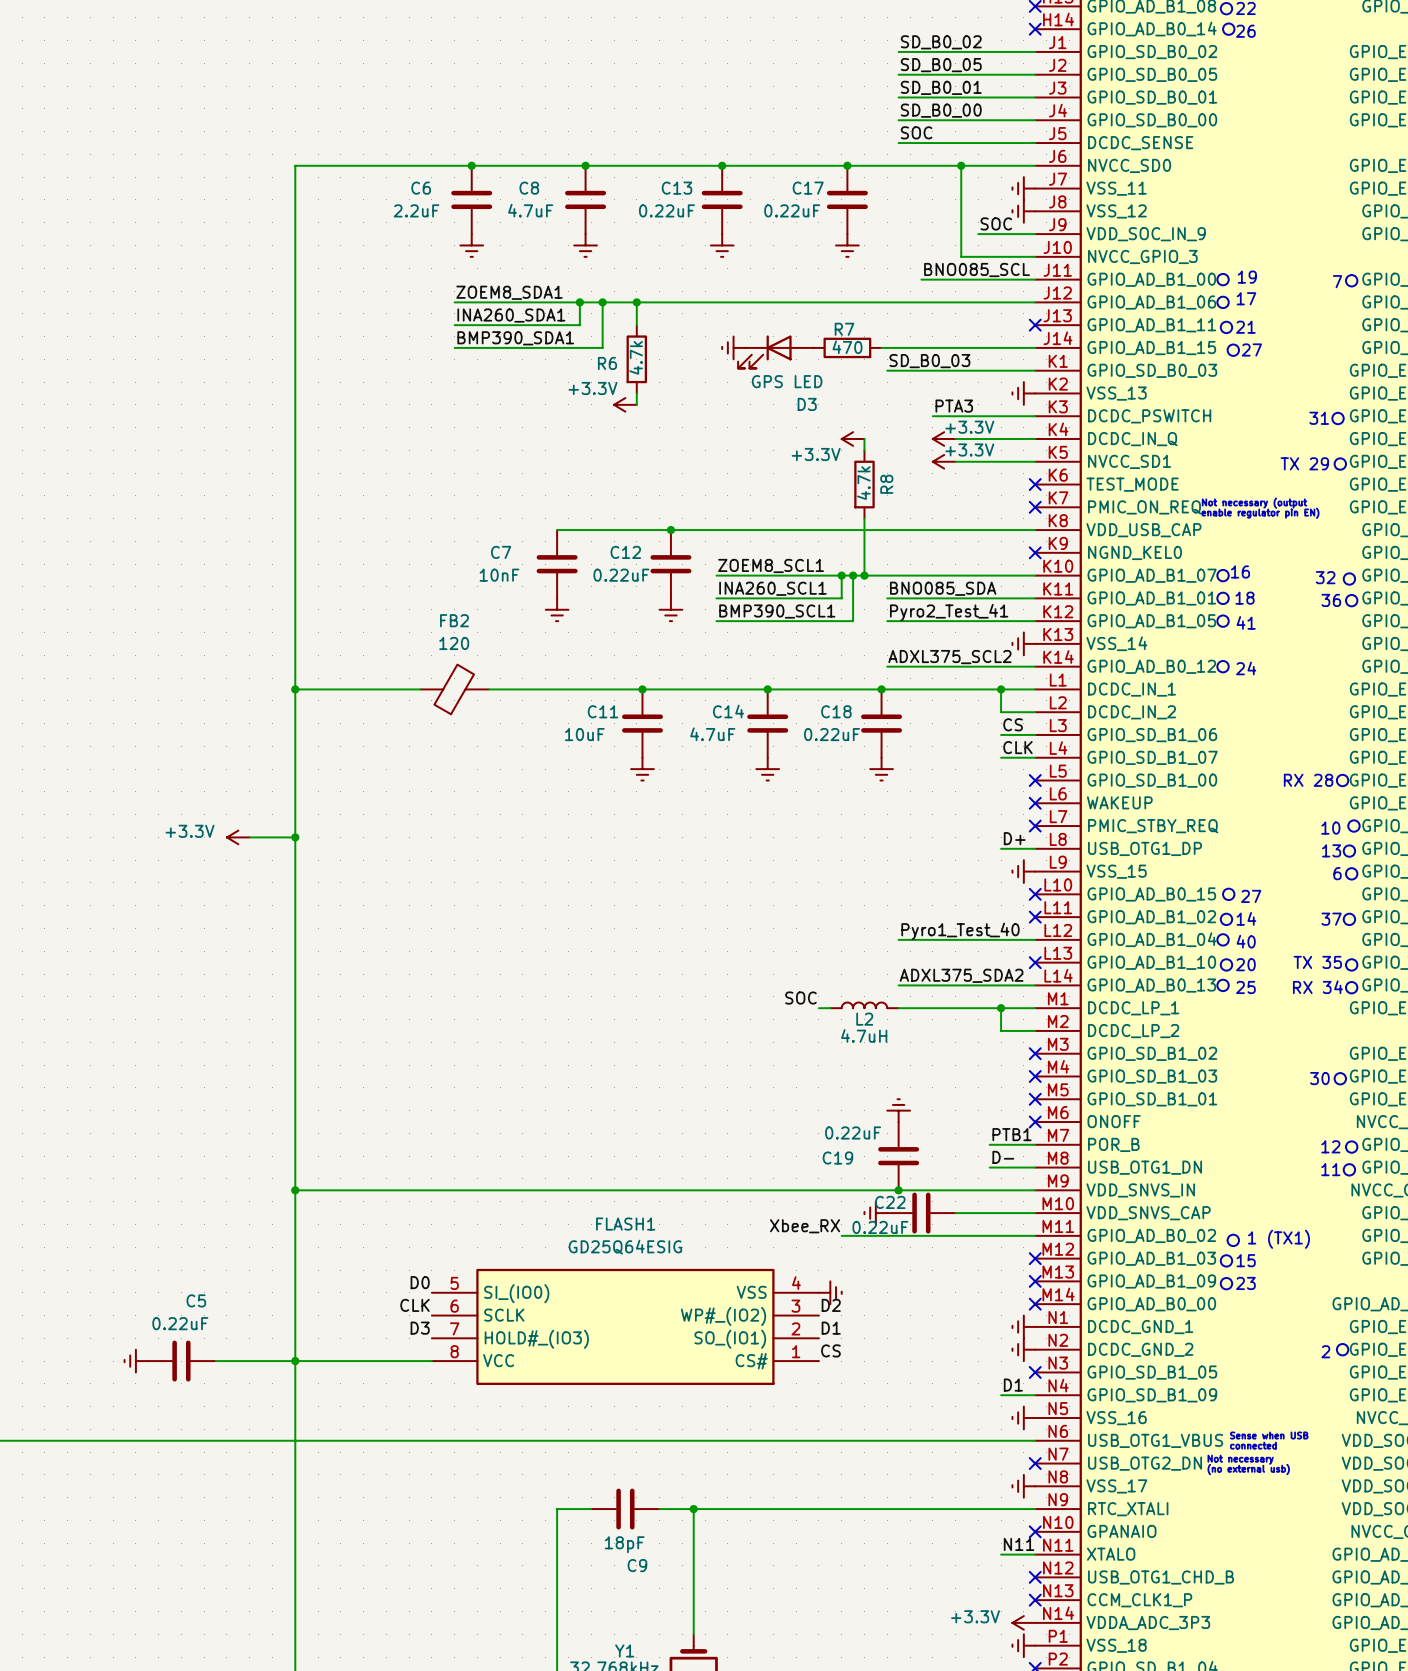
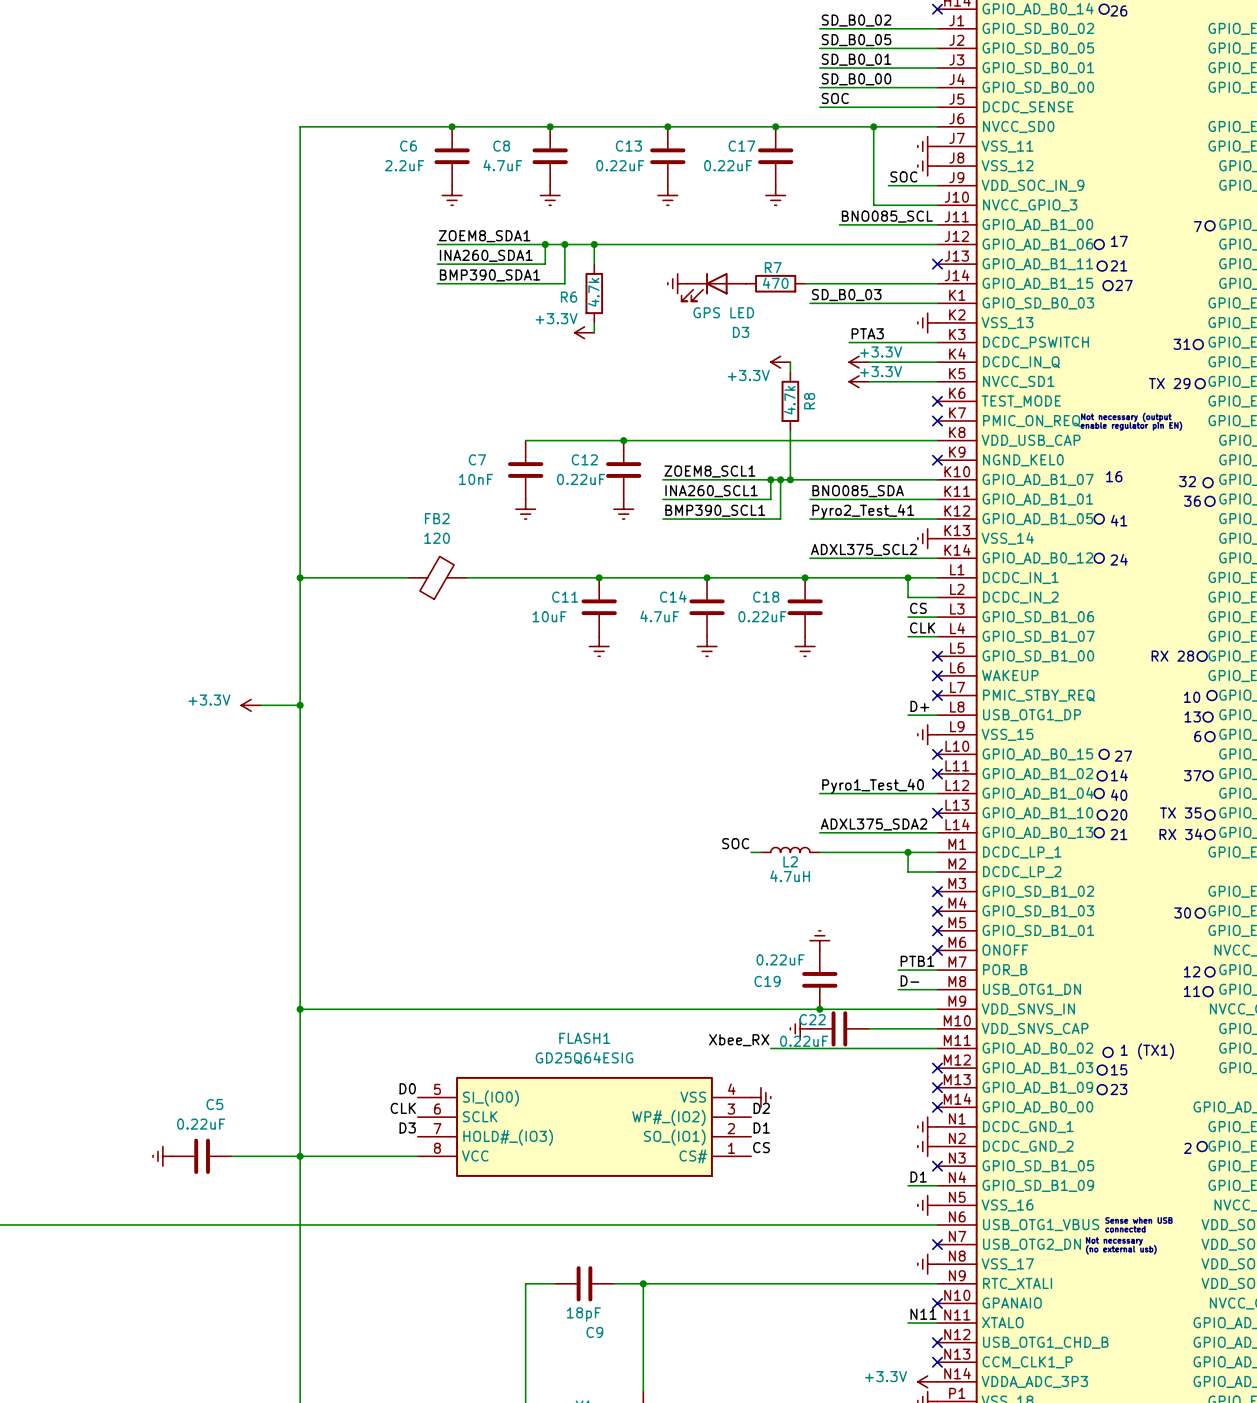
drawing: [1217, 273, 1229, 286] -> none
text: 19 (1247, 277) -> none
drawing: [1217, 569, 1229, 582] -> none
drawing: [1217, 592, 1229, 605] -> none
text: 18 (1245, 598) -> none
text: 25 (1245, 987) -> 21 (1118, 834)

